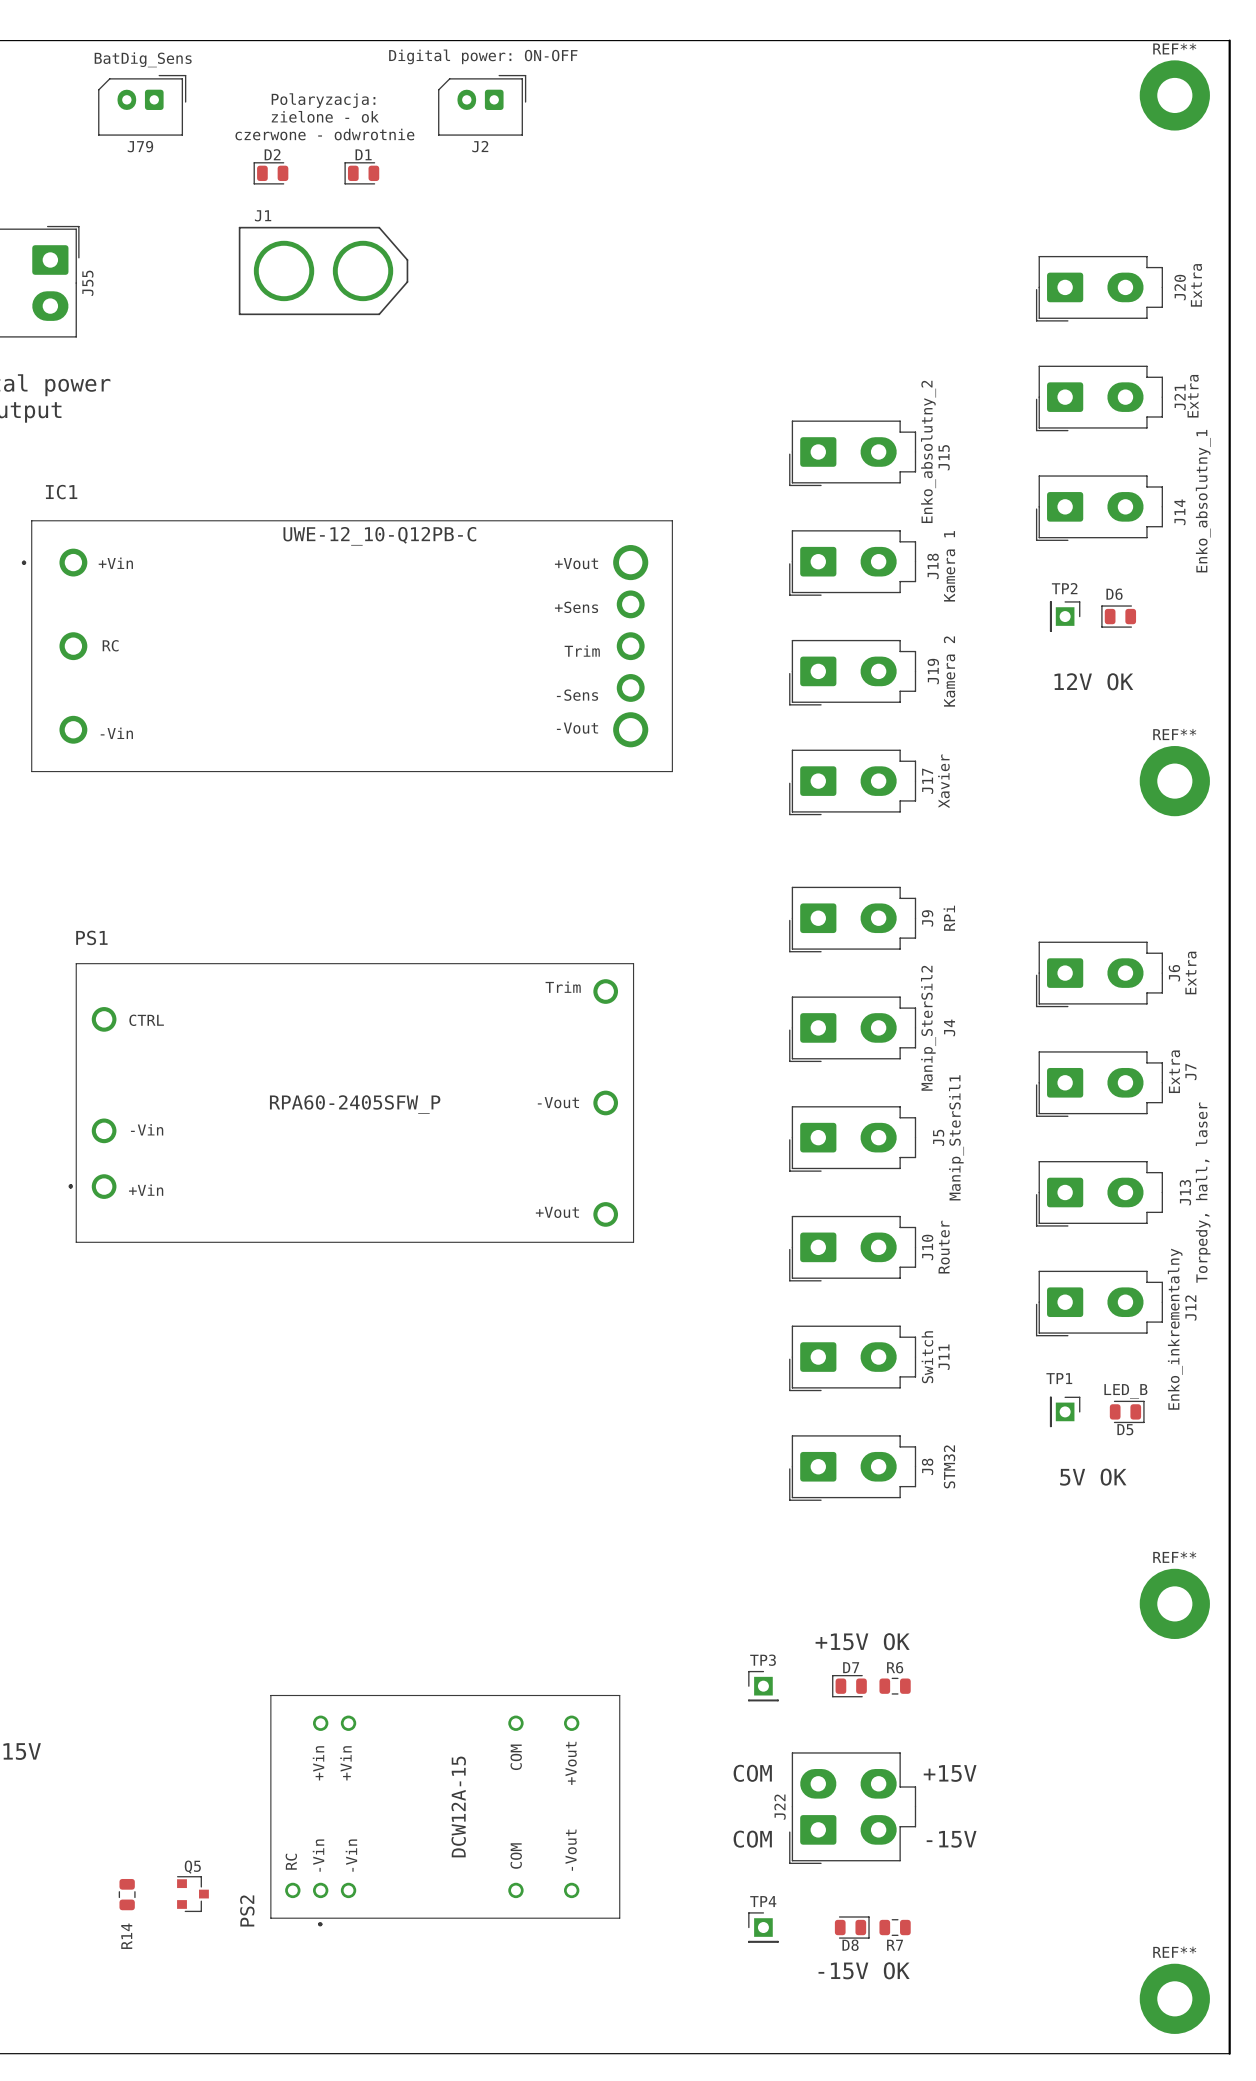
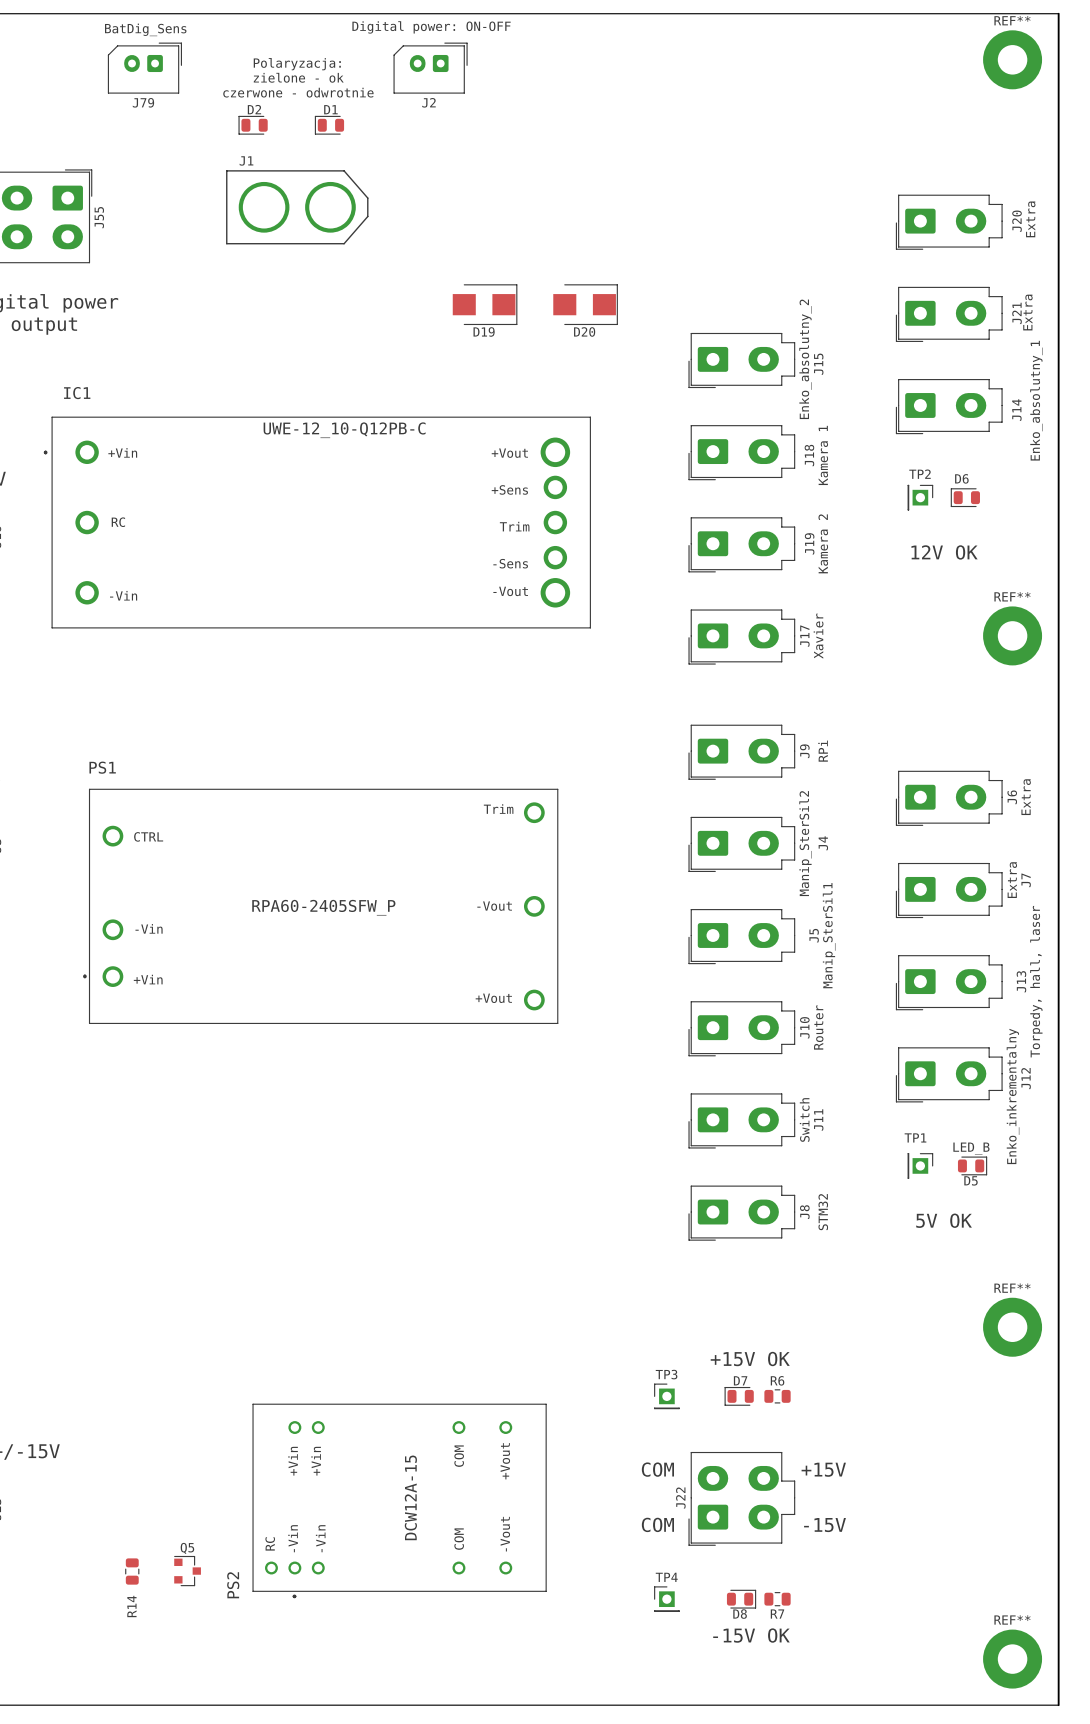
D19: none -> (485, 304)
D20: none -> (585, 304)

